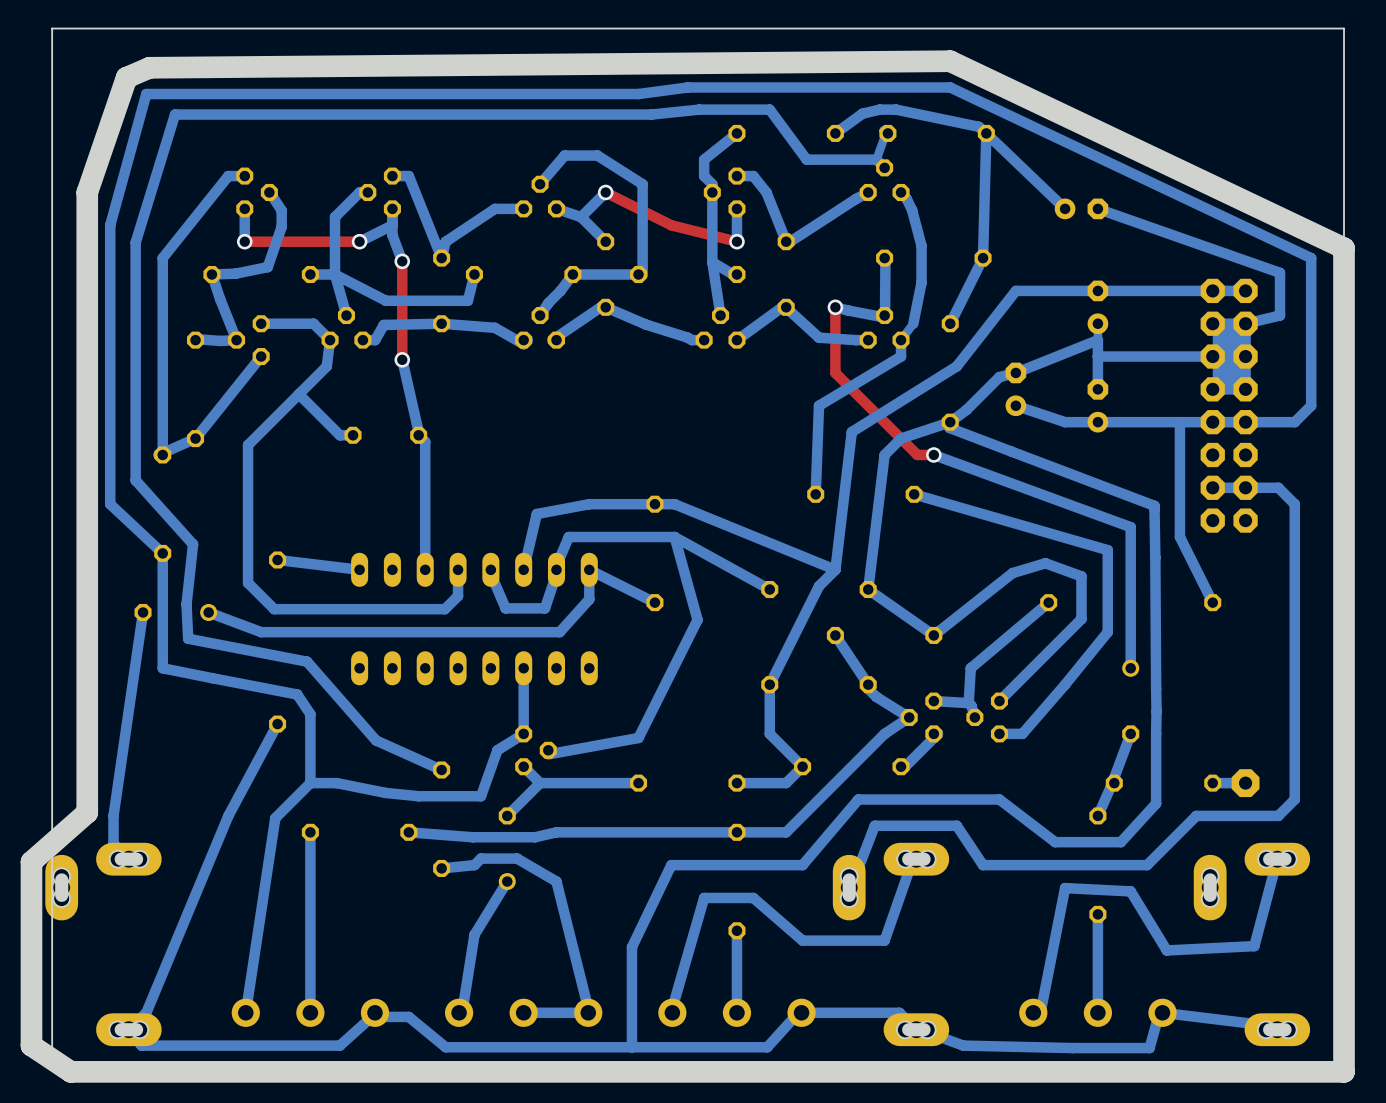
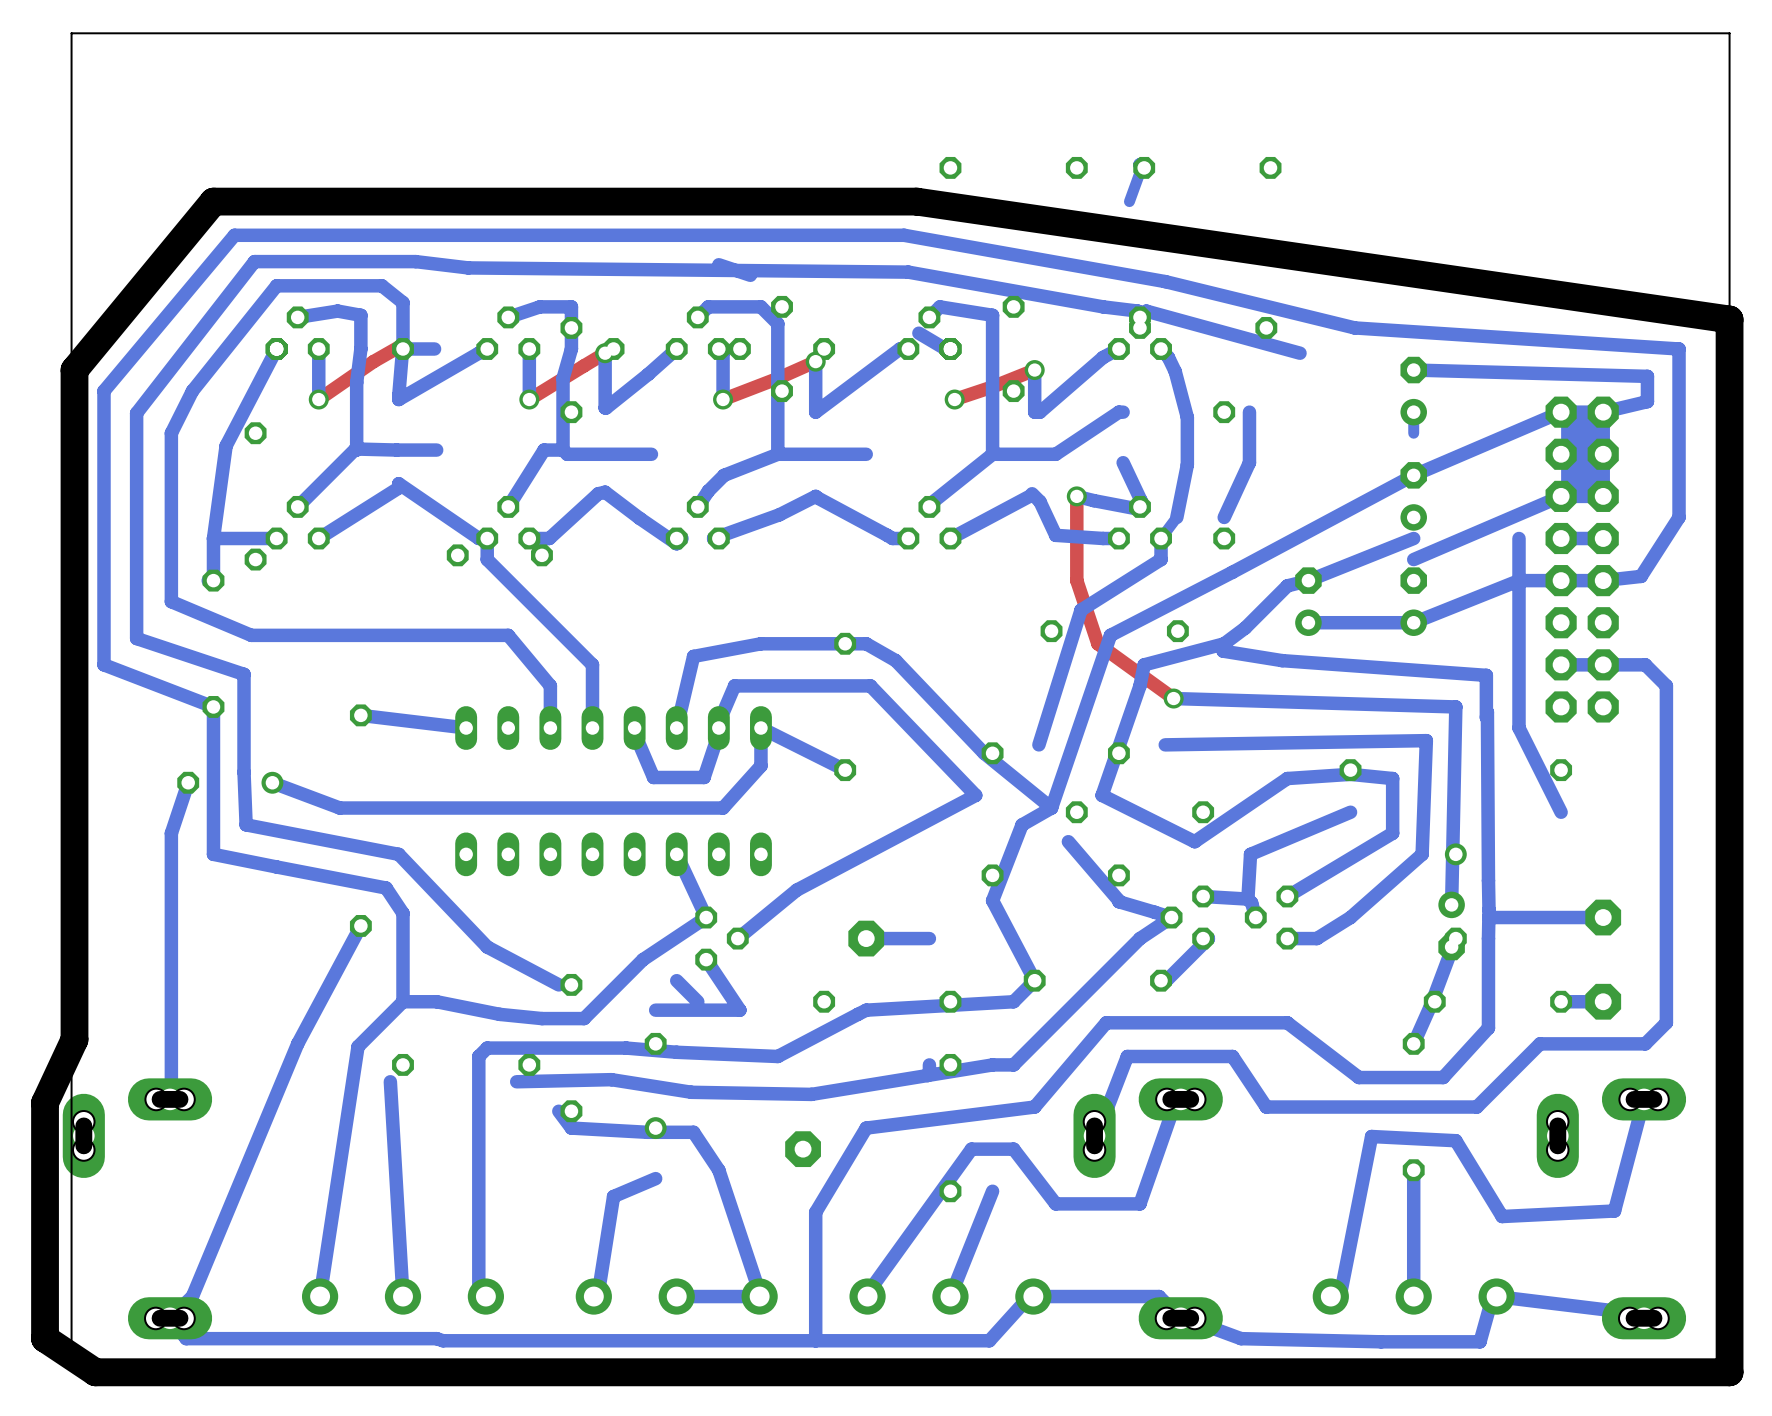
bottom track: (736, 133) (704, 159) (704, 176) (712, 184) (712, 262) (720, 315) -> none
bottom track: (986, 133) (1065, 208) -> none
bottom track: (986, 133) (978, 126) (896, 109) (879, 109) (862, 113) (835, 133) -> none
bottom track: (986, 133) (983, 258) (950, 323) -> none
bottom track: (884, 167) (876, 159) (806, 159) (769, 109) (699, 109) (651, 114) (175, 114) (135, 242) (135, 480) (193, 544) (186, 604) (188, 638) (307, 661) (376, 740) (441, 769) -> none
bottom track: (244, 176) (228, 176) (162, 258) (162, 422) -> none
bottom track: (392, 176) (408, 176) (441, 258) (445, 241) (494, 208) (523, 208) -> none
bottom track: (736, 176) (753, 176) (766, 192) (786, 241) (790, 241) (868, 192) -> none
part: (884, 180) -> none
bottom track: (540, 184) (564, 155) (597, 155) (642, 184) (642, 274) (572, 274) (540, 315) -> none
part: (257, 192) -> none
bottom track: (269, 192) (281, 210) (281, 226) (267, 267) (235, 273) (211, 274) (236, 340) (195, 340) -> none
bottom track: (367, 192) (359, 192) (335, 217) (335, 274) -> none
part: (380, 192) -> none
bottom track: (605, 192) (581, 217) (605, 241) -> none
top track: (605, 192) (671, 225) (736, 241) -> none
via: (605, 192) -> none
part: (724, 192) -> none
bottom track: (901, 192) (912, 210) (921, 245) (921, 282) (913, 323) (901, 340) (901, 356) (818, 405) (815, 494) -> none
part: (540, 196) -> none
bottom track: (244, 208) (244, 241) -> none
bottom track: (392, 208) (392, 235) (402, 261) -> none
bottom track: (736, 208) (736, 241) -> none
part: (1081, 208) -> none
bottom track: (1097, 208) (1280, 272) (1280, 295) -> (1413, 370) (1647, 376)
bottom track: (392, 225) (359, 241) -> none
via: (244, 241) -> none
top track: (359, 241) (244, 241) -> none
via: (359, 241) -> none
via: (736, 241) -> none
bottom track: none -> (297, 317) (337, 311) (360, 315) (360, 348) (356, 382) (355, 449)
bottom track: none -> (508, 317) (539, 306) (571, 306) (571, 348) (563, 378) (563, 450)
bottom track: none -> (697, 317) (708, 306) (760, 306) (777, 323) (777, 454)
bottom track: none -> (929, 317) (939, 306) (992, 315) (992, 454)
board edge: (1344, 251) (1344, 248) (950, 61) (149, 67) (126, 77) (87, 192) (87, 812) (31, 861) -> (1729, 319) (916, 201) (213, 201) (74, 370) (74, 1039) (45, 1102)
bottom track: (884, 258) (885, 317) -> none
top track: (402, 261) (402, 359) -> none
via: (402, 261) -> none
part: none -> (297, 333)
part: none -> (508, 333)
part: none -> (697, 333)
part: none -> (929, 333)
part: none -> (1139, 333)
top track: none -> (402, 344) (373, 361) (318, 399)
bottom track: none -> (276, 348) (226, 445) (213, 538) (276, 538)
bottom track: none -> (318, 348) (318, 399)
bottom track: (335, 274) (346, 315) -> none
bottom track: none -> (529, 348) (529, 399)
bottom track: (474, 274) (467, 300) (385, 300) (335, 274) -> none
bottom track: none -> (676, 348) (606, 407) (605, 353)
bottom track: none -> (718, 348) (723, 353) (723, 399)
bottom track: none -> (908, 348) (899, 348) (815, 412) (815, 361)
bottom track: none -> (1118, 348) (1103, 357) (1039, 412) (1034, 412) (1034, 370)
bottom track: none -> (1161, 348) (1168, 357) (1175, 371) (1187, 417) (1187, 464) (1176, 517) (1161, 538) (1161, 559) (1081, 610) (1038, 744)
top track: none -> (605, 353) (529, 399)
via: none -> (605, 353)
bottom track: none -> (1300, 353) (1146, 311) (1139, 317) (1137, 311) (1103, 306) (908, 272) (468, 267) (415, 261) (254, 261) (136, 413) (136, 638) (244, 674) (246, 824) (398, 854) (487, 947) (558, 984)
top track: none -> (815, 361) (723, 399)
via: none -> (815, 361)
top track: none -> (1034, 370) (954, 399)
bottom track: (1245, 290) (1015, 290) (956, 366) (851, 432) (835, 569) -> none
bottom track: (835, 307) (885, 317) -> (1076, 496) (1140, 509)
top track: (835, 307) (835, 372) (917, 454) (933, 454) -> none
via position: (835, 307) -> (1034, 370)
bottom track: (790, 311) (818, 337) (868, 340) -> none
bottom track: (790, 311) (784, 305) (736, 340) -> none
via: none -> (318, 399)
via: none -> (529, 399)
via: none -> (723, 399)
via: none -> (954, 399)
bottom track: (261, 323) (313, 323) (330, 340) (326, 366) (248, 445) (248, 582) (274, 609) (444, 609) (458, 596) (458, 569) -> (318, 538) (398, 487) (398, 483) (478, 538) (487, 538) (487, 559) (592, 664) (592, 728)
bottom track: none -> (1123, 412) (1118, 412) (1055, 454) (992, 454)
bottom track: none -> (1249, 412) (1249, 462) (1224, 517)
bottom track: none -> (1561, 412) (1413, 475) (1110, 635) (1051, 808)
part: (346, 327) -> none
part: (540, 327) -> none
part: (720, 327) -> none
part: (884, 327) -> none
part: (248, 340) -> none
bottom track: (523, 340) (527, 340) (523, 344) (494, 327) (441, 323) (383, 324) (375, 340) (362, 340) -> none
bottom track: (704, 340) (691, 340) (645, 324) (603, 305) (552, 340) (556, 340) -> none
bottom track: none -> (355, 449) (436, 450)
bottom track: none -> (355, 449) (297, 506)
bottom track: none -> (563, 450) (544, 450) (508, 506)
bottom track: none -> (563, 450) (567, 454) (651, 454)
bottom track: (261, 356) (195, 438) (158, 454) -> none
bottom track: none -> (777, 454) (724, 475) (708, 491) (697, 506)
bottom track: none -> (866, 454) (777, 454)
bottom track: none -> (992, 454) (929, 504) (929, 506)
bottom track: (1212, 356) (1097, 356) -> none
bottom track: (402, 359) (418, 435) (425, 441) (425, 537) -> (487, 348) (398, 399) (402, 344) (402, 302) (381, 285) (276, 285) (192, 391) (171, 433) (171, 601) (251, 635) (508, 635) (550, 685)
via: (402, 359) -> none
bottom track: none -> (1123, 462) (1141, 500) (1140, 509)
top track: none -> (1076, 496) (1076, 580) (1097, 643) (1173, 698)
via: none -> (1076, 496)
part: (1015, 389) -> none
bottom track: (1097, 389) (1097, 340) (1015, 372) (999, 377) (966, 409) (950, 422) -> none
bottom track: none -> (1561, 496) (1413, 559)
bottom track: none -> (1039, 501) (1055, 535) (1118, 538)
bottom track: none -> (1039, 501) (1032, 493) (950, 538)
bottom track: (298, 394) (339, 435) (353, 435) -> none
bottom track: (1015, 405) (1065, 422) (1212, 422) -> none
part position: (1097, 405) -> (1413, 496)
part position: (1229, 405) -> (1582, 559)
part: none -> (297, 522)
part: none -> (508, 522)
part: none -> (697, 522)
part: none -> (929, 522)
part: none -> (1139, 522)
bottom track: none -> (676, 538) (681, 538) (676, 543) (605, 492) (598, 493) (549, 538) (529, 538)
bottom track: none -> (908, 538) (892, 538) (815, 496) (779, 514) (713, 538) (718, 538)
bottom track: (950, 422) (949, 427) (1154, 505) (1155, 557) -> (1224, 643) (1223, 651) (1282, 660) (1486, 675) (1486, 717) (1487, 712)
bottom track: (950, 422) (901, 438) (884, 454) (868, 589) (933, 635) (1012, 573) (1045, 563) (1081, 576) (1081, 609) -> (1224, 643) (1144, 664) (1139, 685) (1102, 795) (1194, 841) (1287, 778) (1350, 774) (1392, 778)
bottom track: none -> (1413, 538) (1308, 580) (1287, 585) (1245, 627) (1224, 643)
bottom track: (1245, 422) (1294, 422) (1311, 405) (1311, 258) (950, 87) (687, 87) (638, 94) (146, 94) (110, 225) (110, 504) (162, 553) -> (1308, 622) (1413, 622) (1519, 580) (1603, 580) (1641, 576) (1679, 517) (1679, 348) (1354, 327) (1165, 281) (904, 235) (234, 235) (103, 391) (103, 664) (213, 706)
bottom track: (933, 454) (1130, 527) (1130, 668) -> none
via: (933, 454) -> none
part: none -> (1308, 601)
part: none -> (1413, 601)
bottom track: (1245, 487) (1212, 487) (1278, 487) (1294, 504) (1294, 537) -> (1603, 664) (1561, 664) (1645, 664) (1666, 685)
bottom track: (914, 494) (1107, 550) (1107, 632) (1022, 733) -> (1165, 744) (1426, 740) (1422, 854) (1350, 917) (1316, 938)
bottom track: (671, 504) (835, 569) -> (866, 643) (895, 660) (984, 753) (1051, 808)
bottom track: none -> (870, 685) (975, 795) (796, 890) (737, 938)
bottom track: (1179, 537) (1212, 602) -> (1519, 685) (1519, 728) (1561, 812)
bottom track: none -> (1173, 698) (1455, 706) (1451, 904)
via: none -> (1173, 698)
bottom track: (835, 569) (818, 586) (769, 684) (769, 733) (802, 766) -> (1051, 808) (1022, 824) (992, 900) (1034, 980)
bottom track: (769, 589) (674, 537) (697, 619) (638, 737) (548, 754) (548, 750) -> none
bottom track: (1048, 602) (970, 668) -> (1350, 812) (1250, 854)
bottom track: (143, 612) (113, 815) (113, 843) (128, 859) -> (188, 782) (171, 833) (171, 1100) (170, 1099)
bottom track: (1081, 619) (999, 701) -> (1392, 791) (1392, 833) (1287, 896)
bottom track: (835, 635) (868, 684) (868, 688) (876, 696) (909, 717) -> (1068, 841) (1118, 901) (1171, 917)
bottom track: (523, 668) (523, 733) (497, 750) (481, 796) (451, 796) -> (676, 854) (706, 917) (643, 959) (584, 1018)
bottom track: none -> (1603, 917) (1489, 917)
part: none -> (1603, 917)
part: none -> (1451, 925)
part: none -> (866, 938)
bottom track: none -> (929, 938) (866, 938)
part position: (535, 750) -> (722, 938)
bottom track: none -> (706, 959) (739, 1010) (655, 1010)
bottom track: (638, 783) (540, 783) (507, 815) -> none
bottom track: (786, 783) (736, 783) -> (1013, 1001) (866, 1010) (777, 1056) (626, 1048) (487, 1048) (478, 1056) (478, 1292)
bottom track: (310, 832) (310, 1012) -> (390, 1081) (402, 1296)
bottom track: none -> (929, 1064) (927, 1075)
bottom track: (769, 832) (556, 832) (535, 837) (472, 837) (408, 832) -> (992, 1064) (811, 1094) (691, 1092) (611, 1079) (516, 1081)
bottom track: (802, 865) (671, 865) (631, 947) -> (1034, 1107) (866, 1128) (815, 1212)
bottom track: (441, 868) (474, 865) (481, 858) (517, 858) (556, 881) (589, 1012) -> (558, 1111) (571, 1128) (647, 1132) (693, 1132) (718, 1170) (760, 1296)
bottom track: (507, 881) (474, 934) -> (655, 1178) (613, 1196)
part: none -> (803, 1149)
bottom track: (736, 930) (736, 1012) -> (992, 1191) (950, 1296)
bottom track: (818, 940) (802, 940) (753, 897) (704, 897) (671, 1011) -> (1055, 1203) (1013, 1149) (971, 1149) (866, 1295)
bottom track: (336, 1045) (339, 1045) (371, 1016) (371, 1012) (374, 1012) (376, 1016) (408, 1016) (445, 1047) -> (436, 1338) (443, 1340) (576, 1340)

